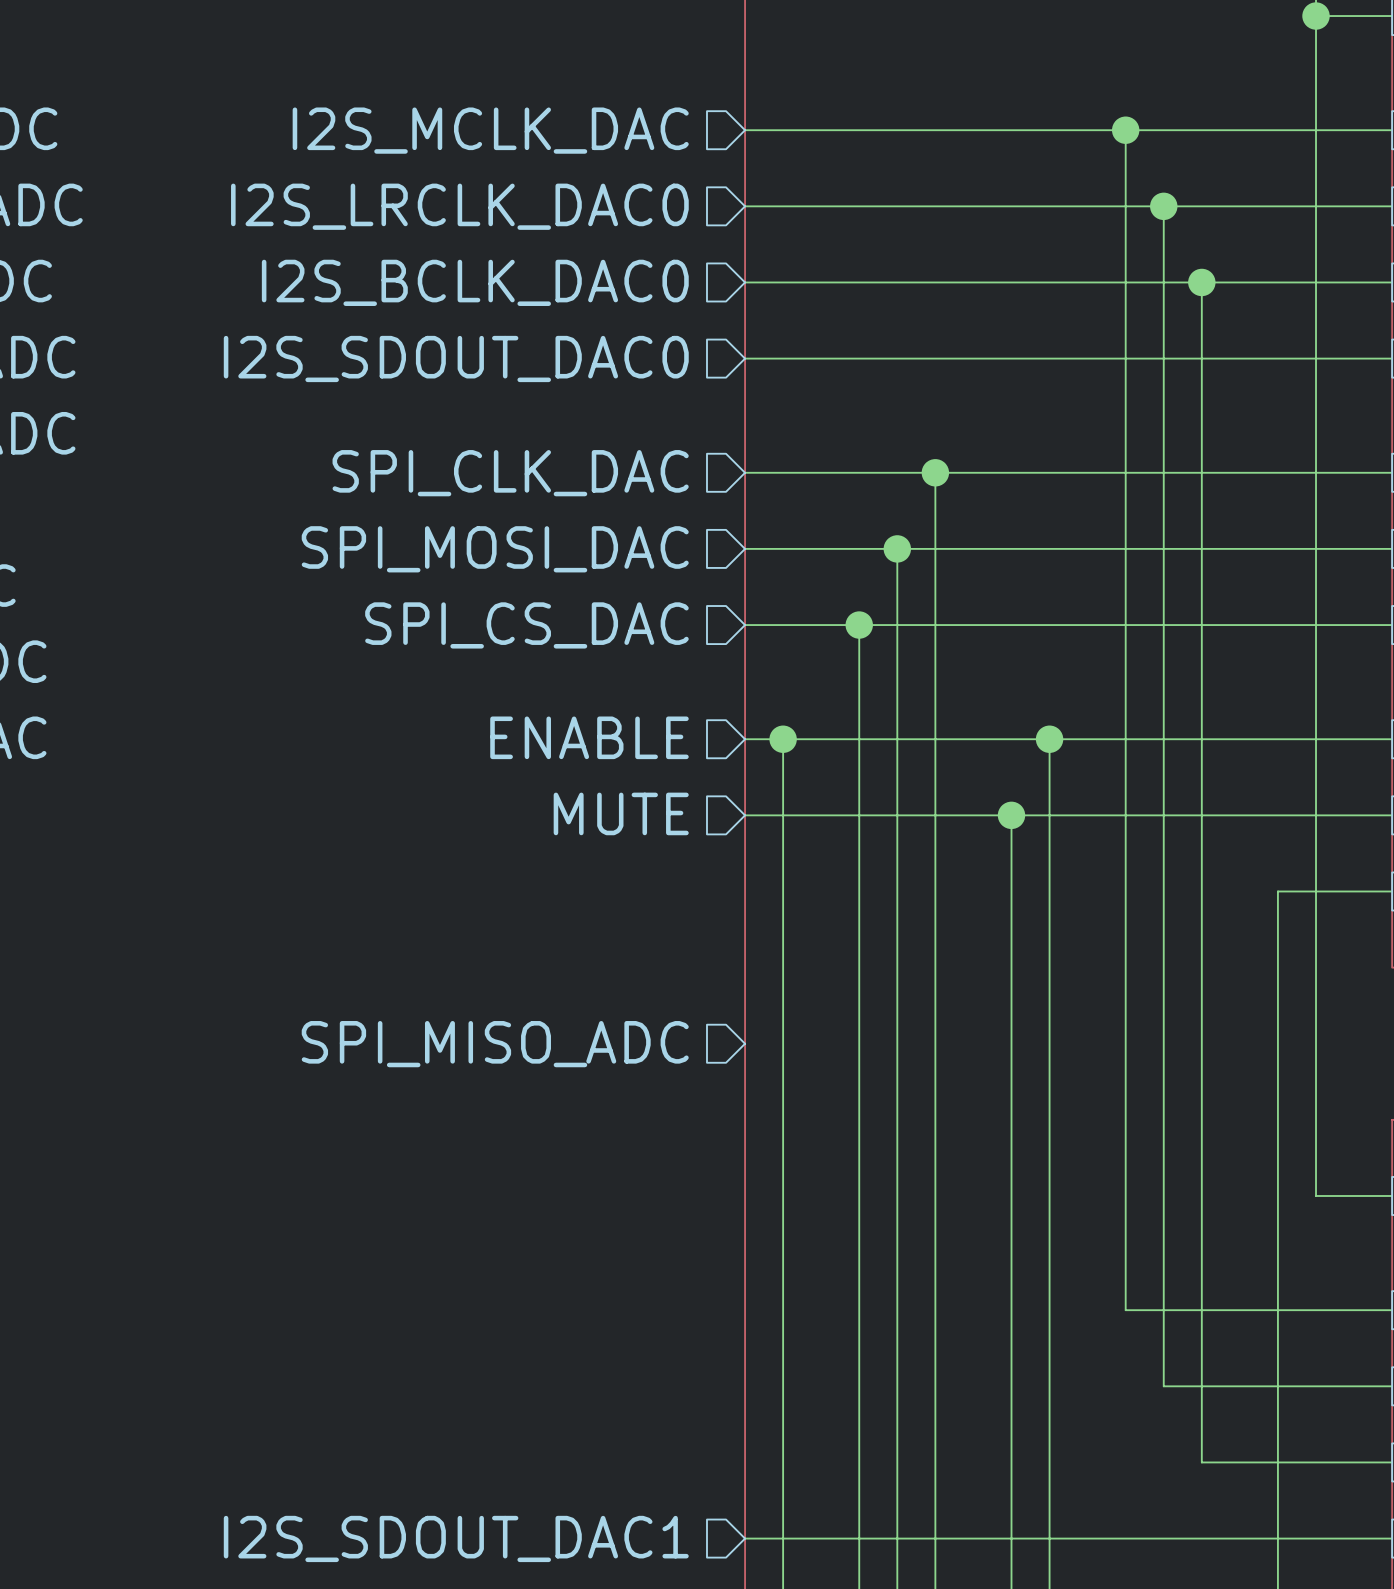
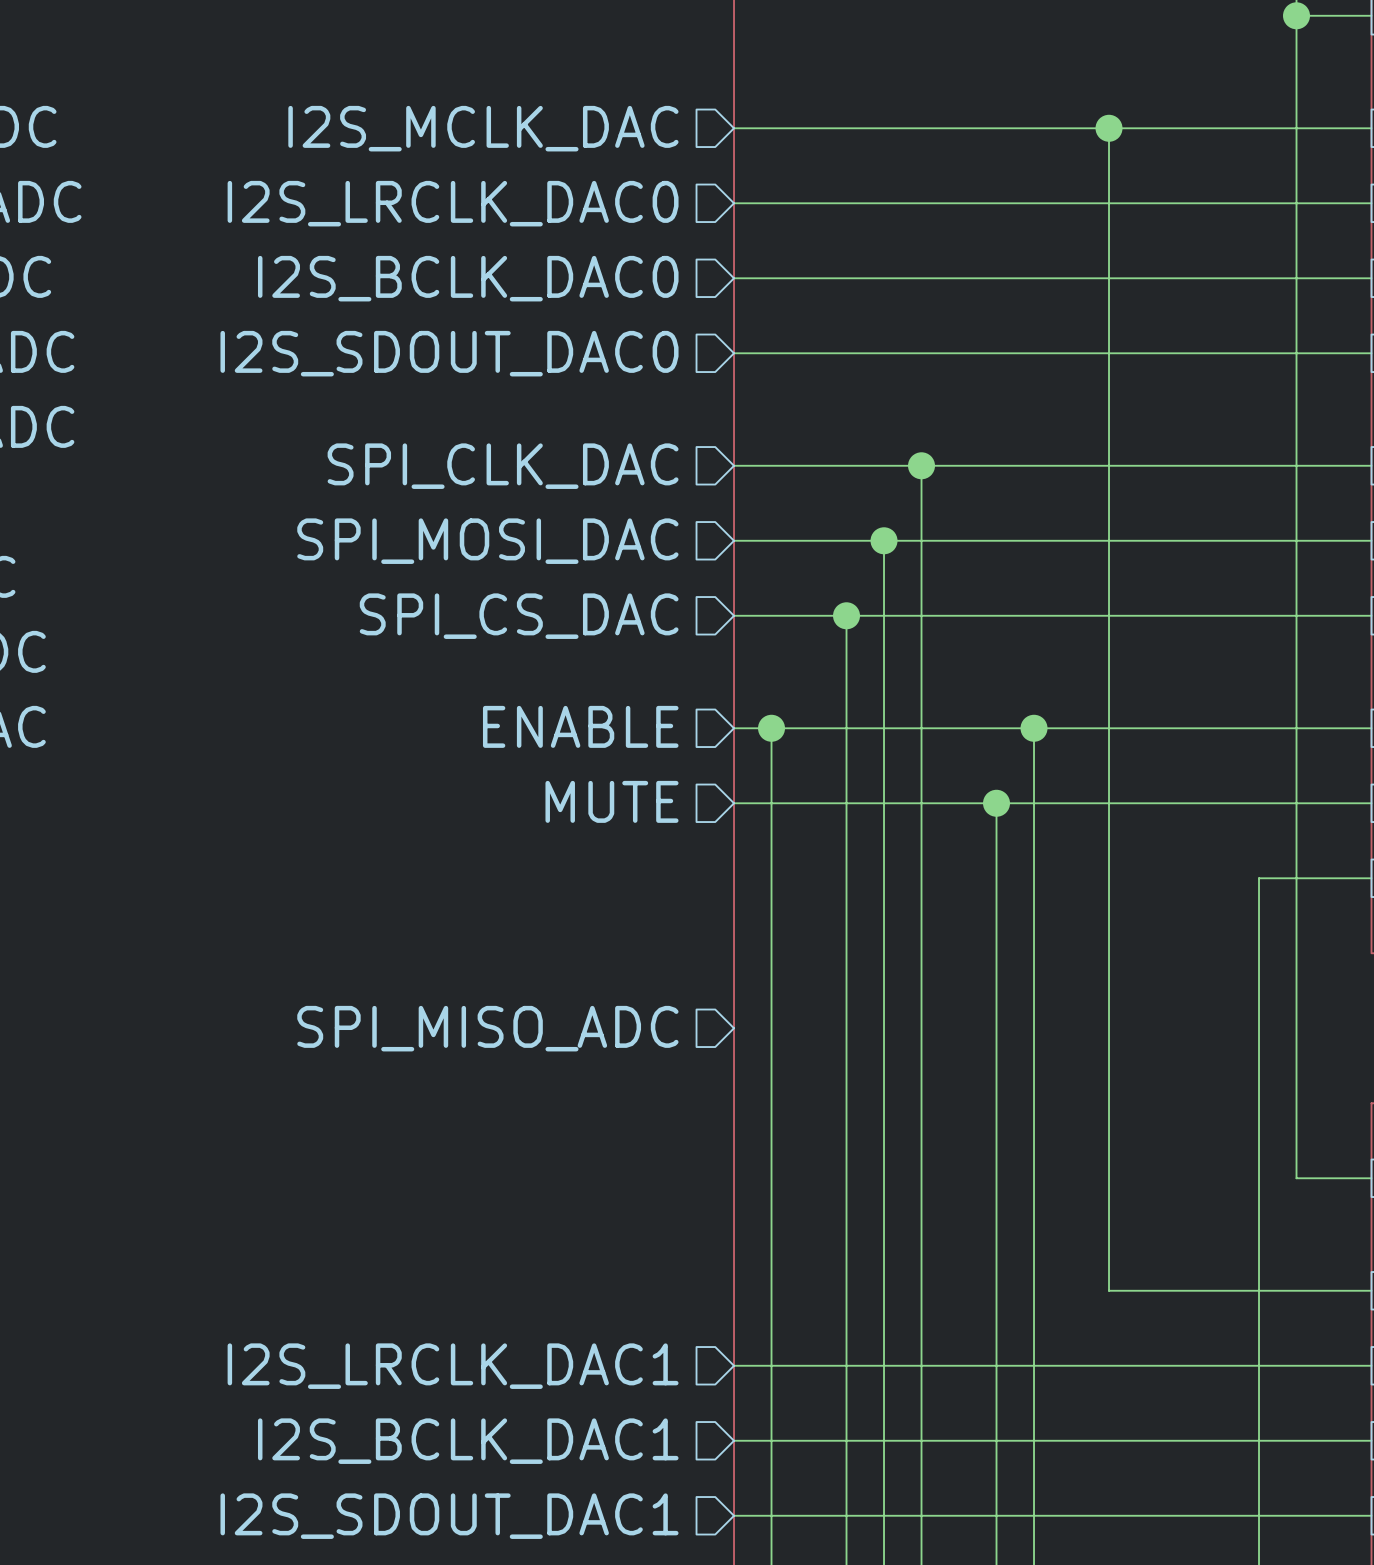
wire: (1163, 206) (1163, 1386) -> (734, 1365) (1146, 1365)
junction: (1163, 206) -> none
wire: (1201, 282) (1201, 1462) -> (734, 1440) (1184, 1440)
junction: (1201, 282) -> none
sheet pin: none -> I2S_LRCLK_DAC1 (453, 1366)
sheet pin: none -> I2S_BCLK_DAC1 (468, 1441)

